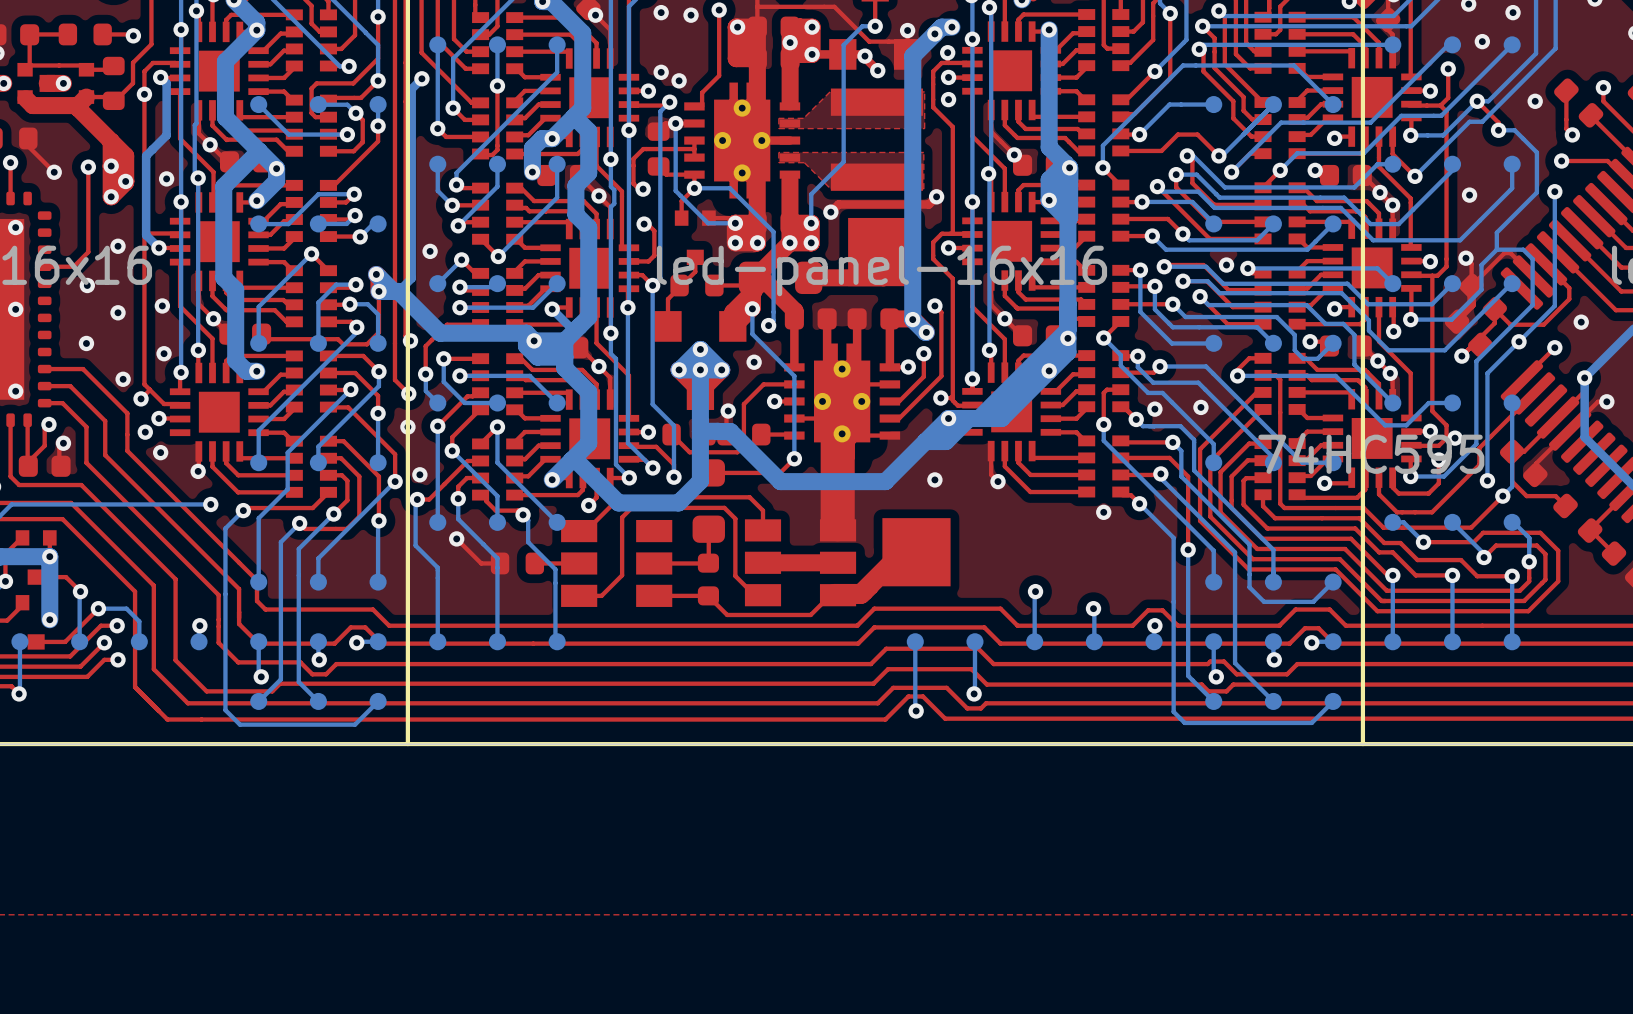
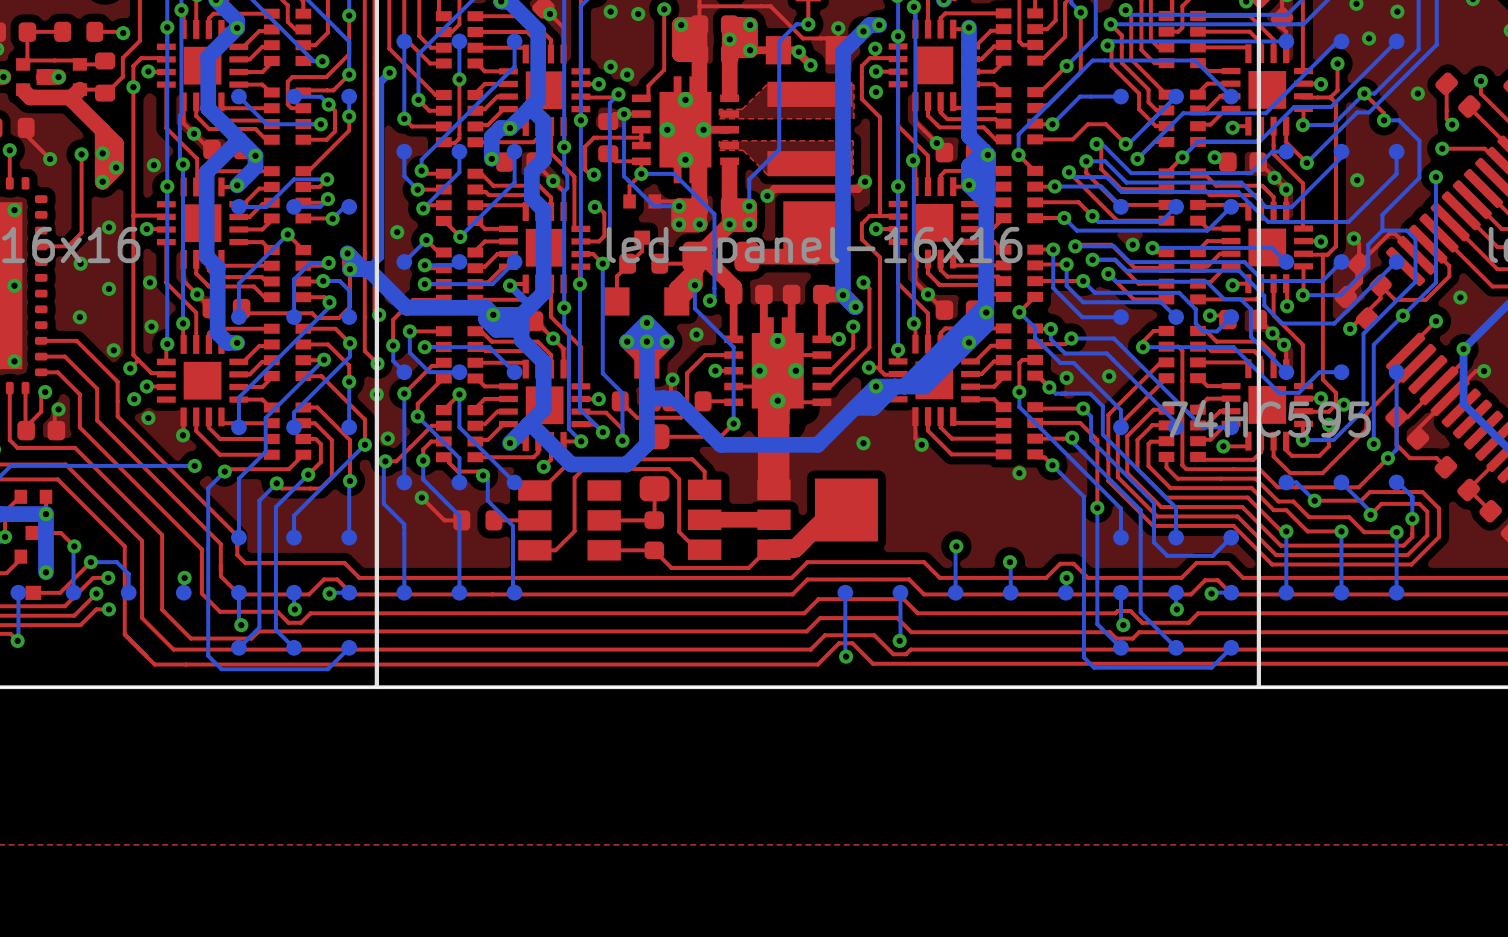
bottom track: (160, 77) (166, 83) (166, 135) (146, 155) (146, 235) (158, 247) -> none

